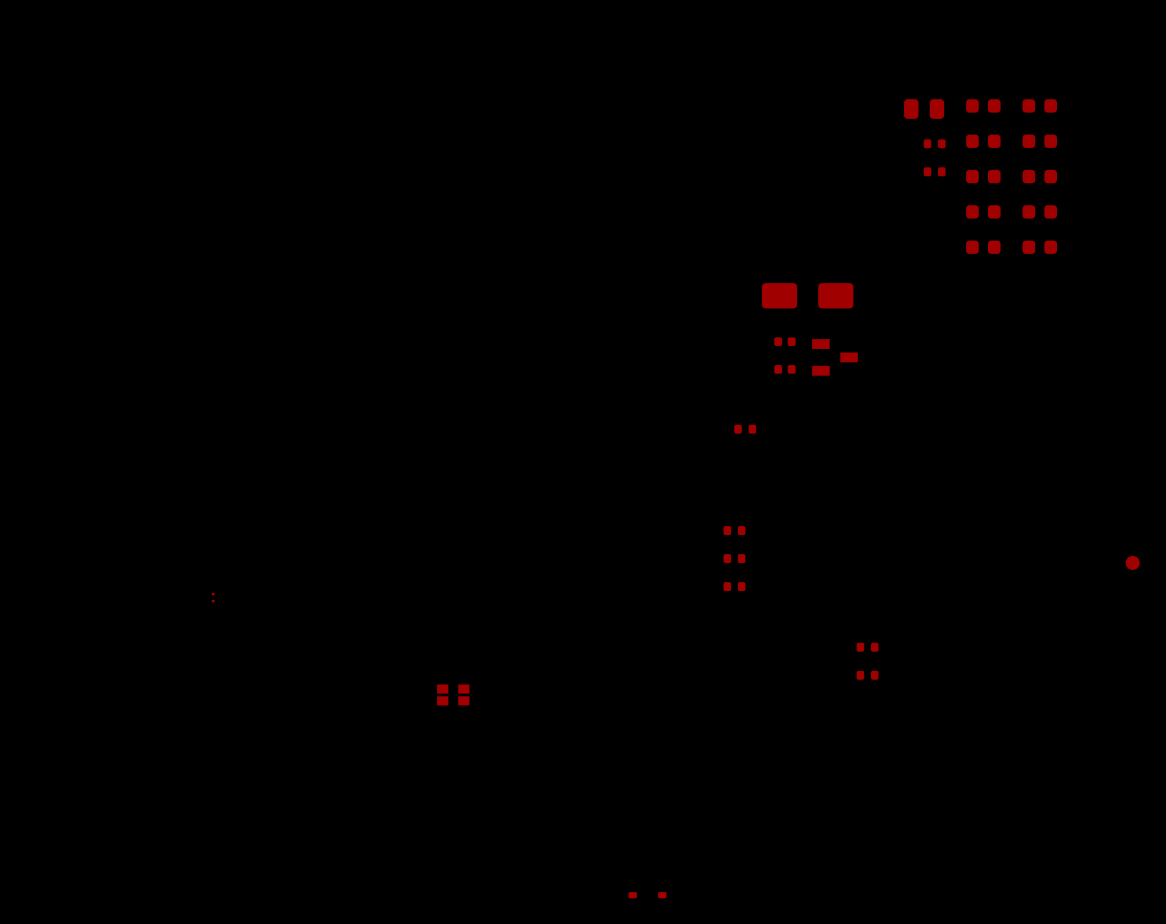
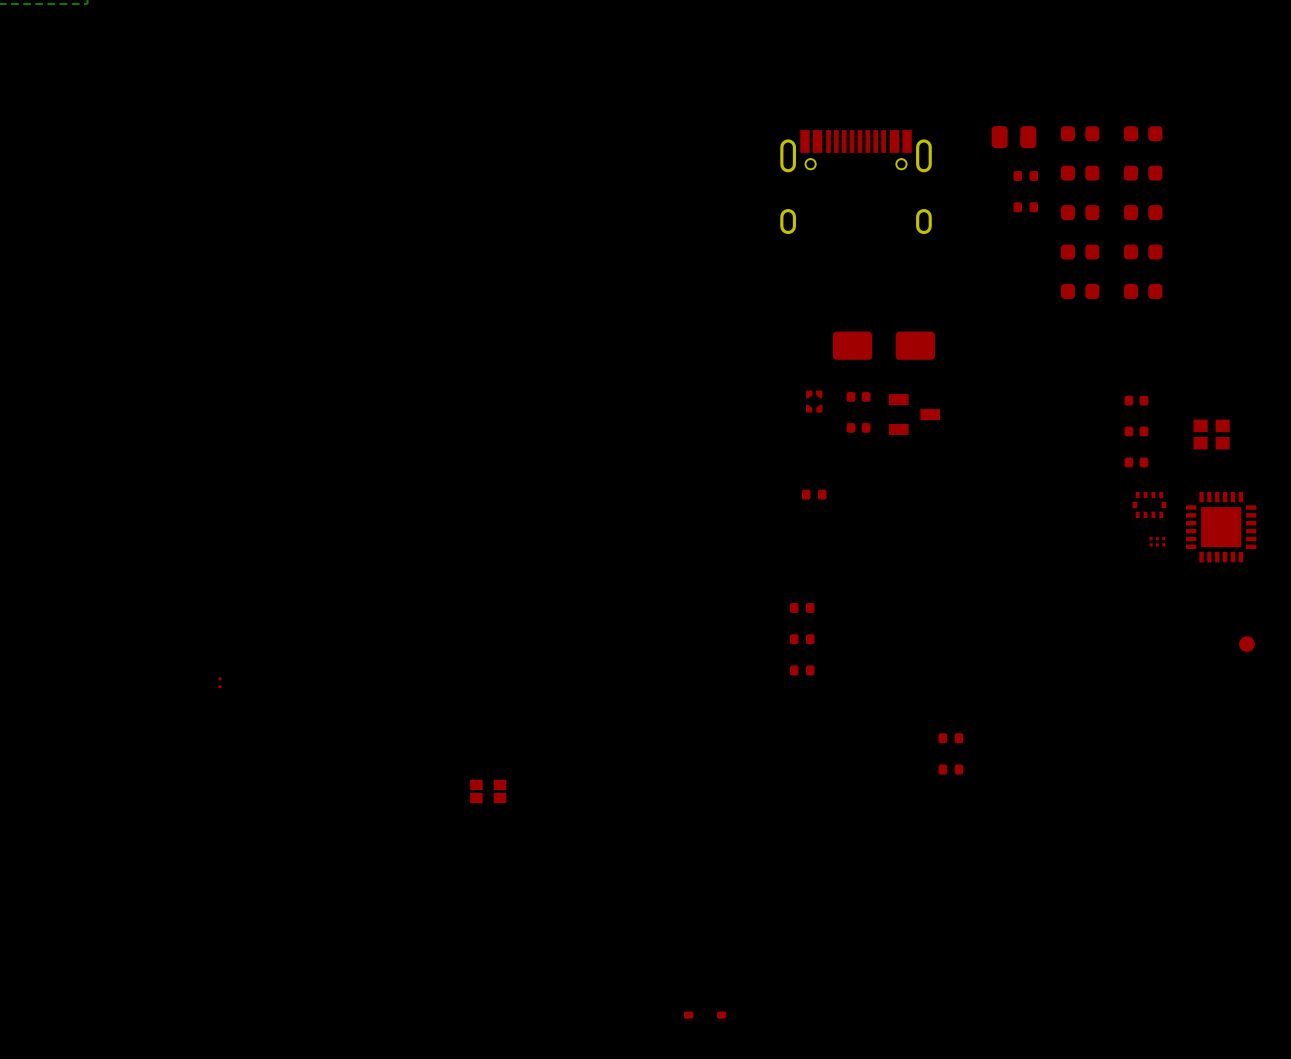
part: none -> (856, 182)
part: none -> (1136, 400)
part: none -> (814, 401)
part: none -> (1136, 431)
part: none -> (1211, 434)
part: none -> (1136, 462)
part: none -> (1149, 504)
part: none -> (1221, 527)
part: none -> (1157, 541)

